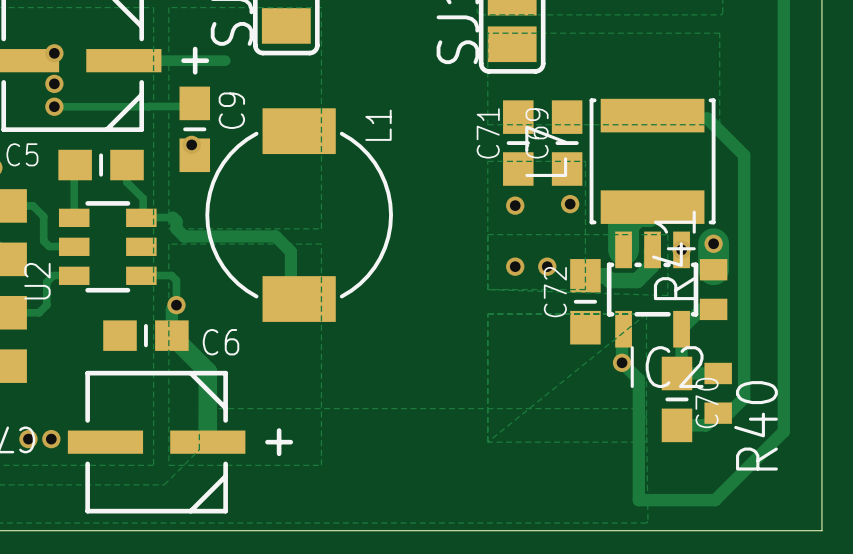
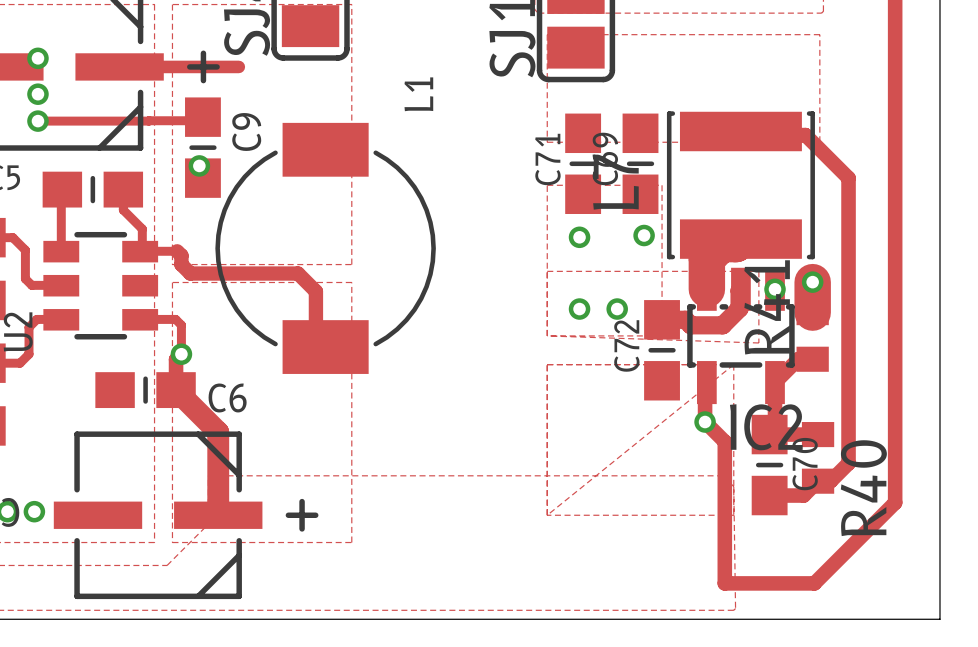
L1 name position: L1 (378, 125) -> L1 (418, 94)

